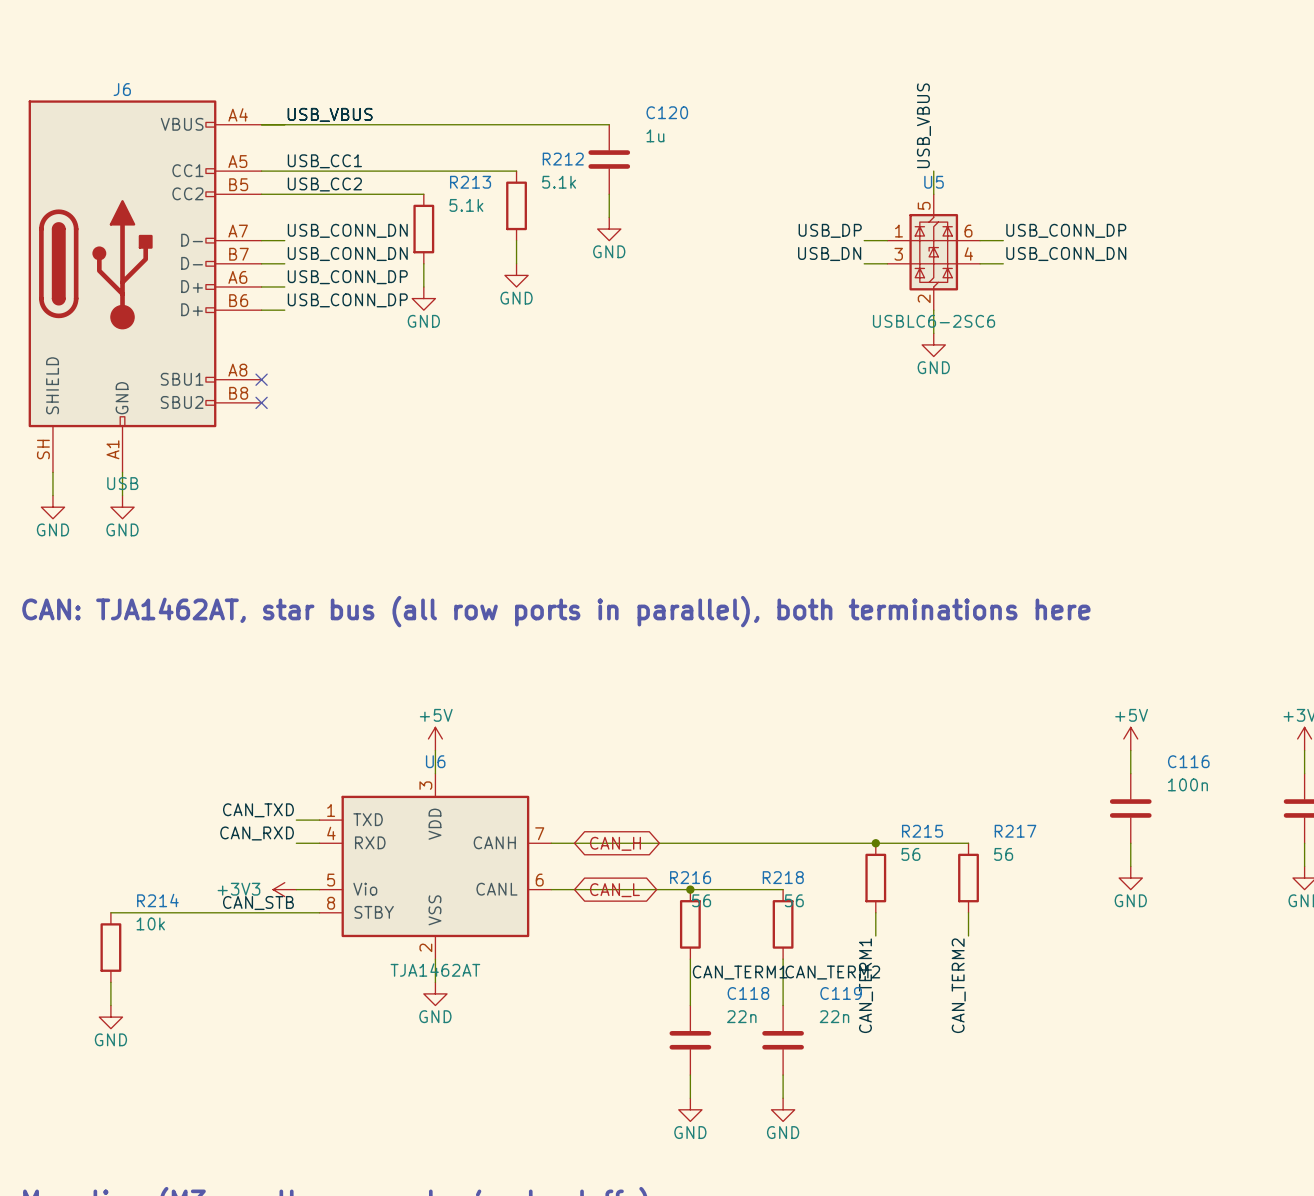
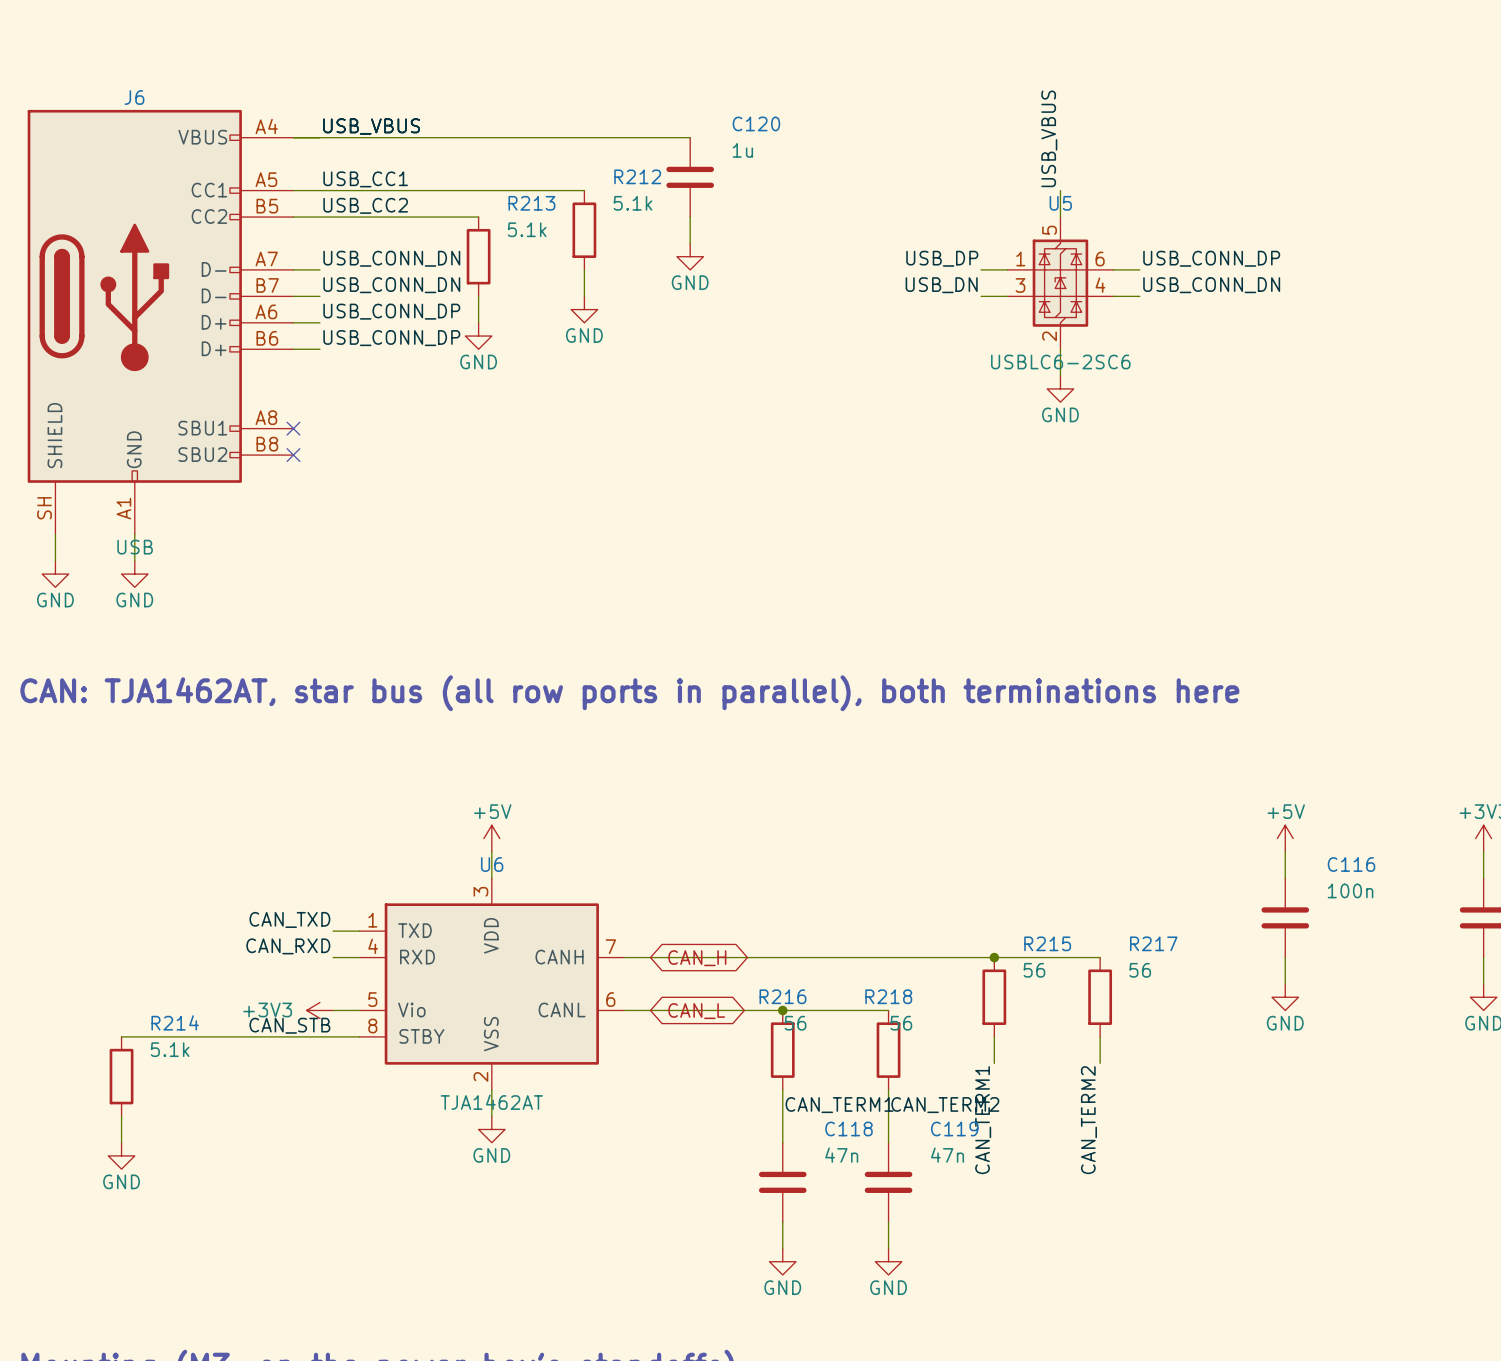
R214 value: 10k (150, 923) -> 5.1k (170, 1049)
C118 value: 22n (741, 1016) -> 47n (841, 1155)
C119 value: 22n (834, 1016) -> 47n (947, 1155)

